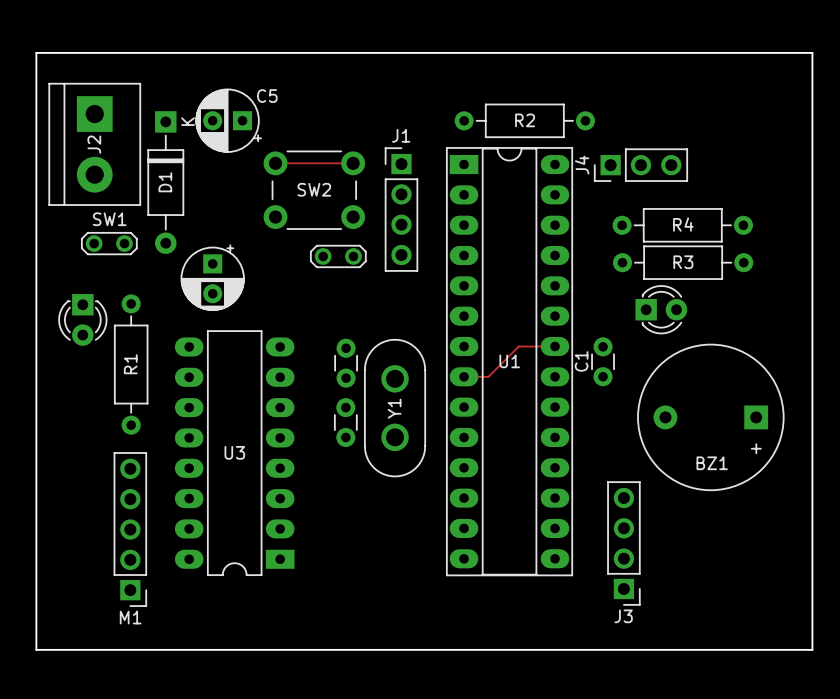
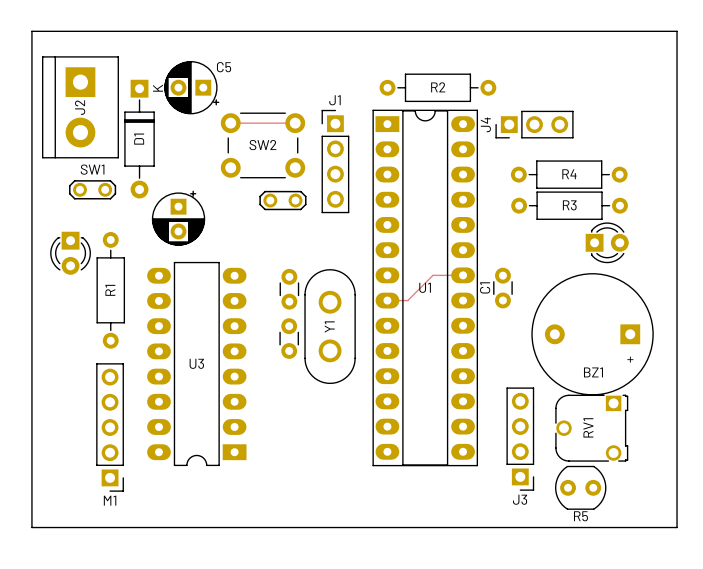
part position: (661, 309) -> (607, 242)
RV1: none -> (591, 428)
R5: none -> (580, 487)

